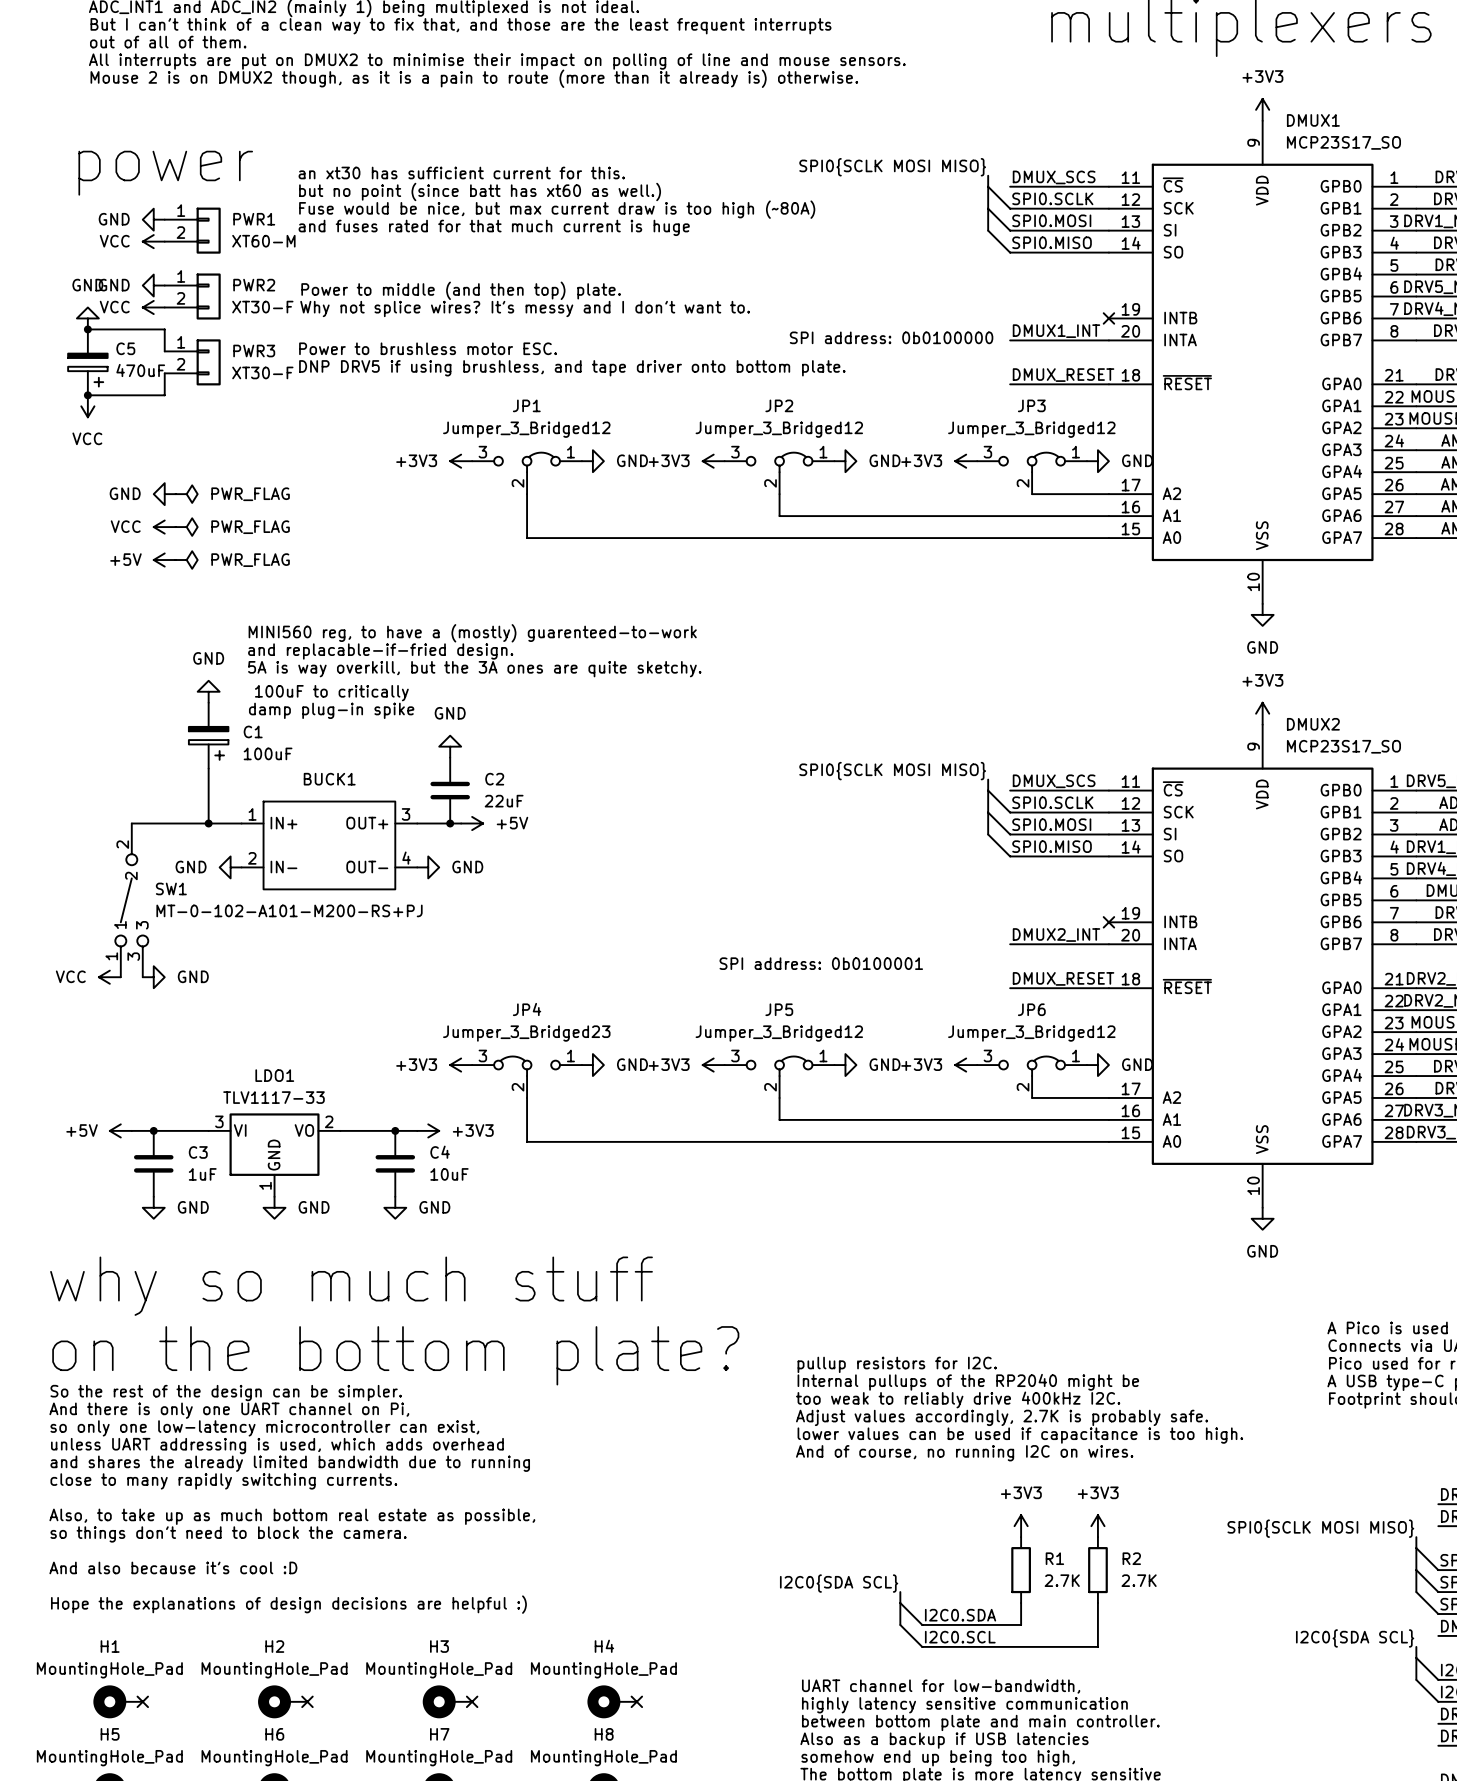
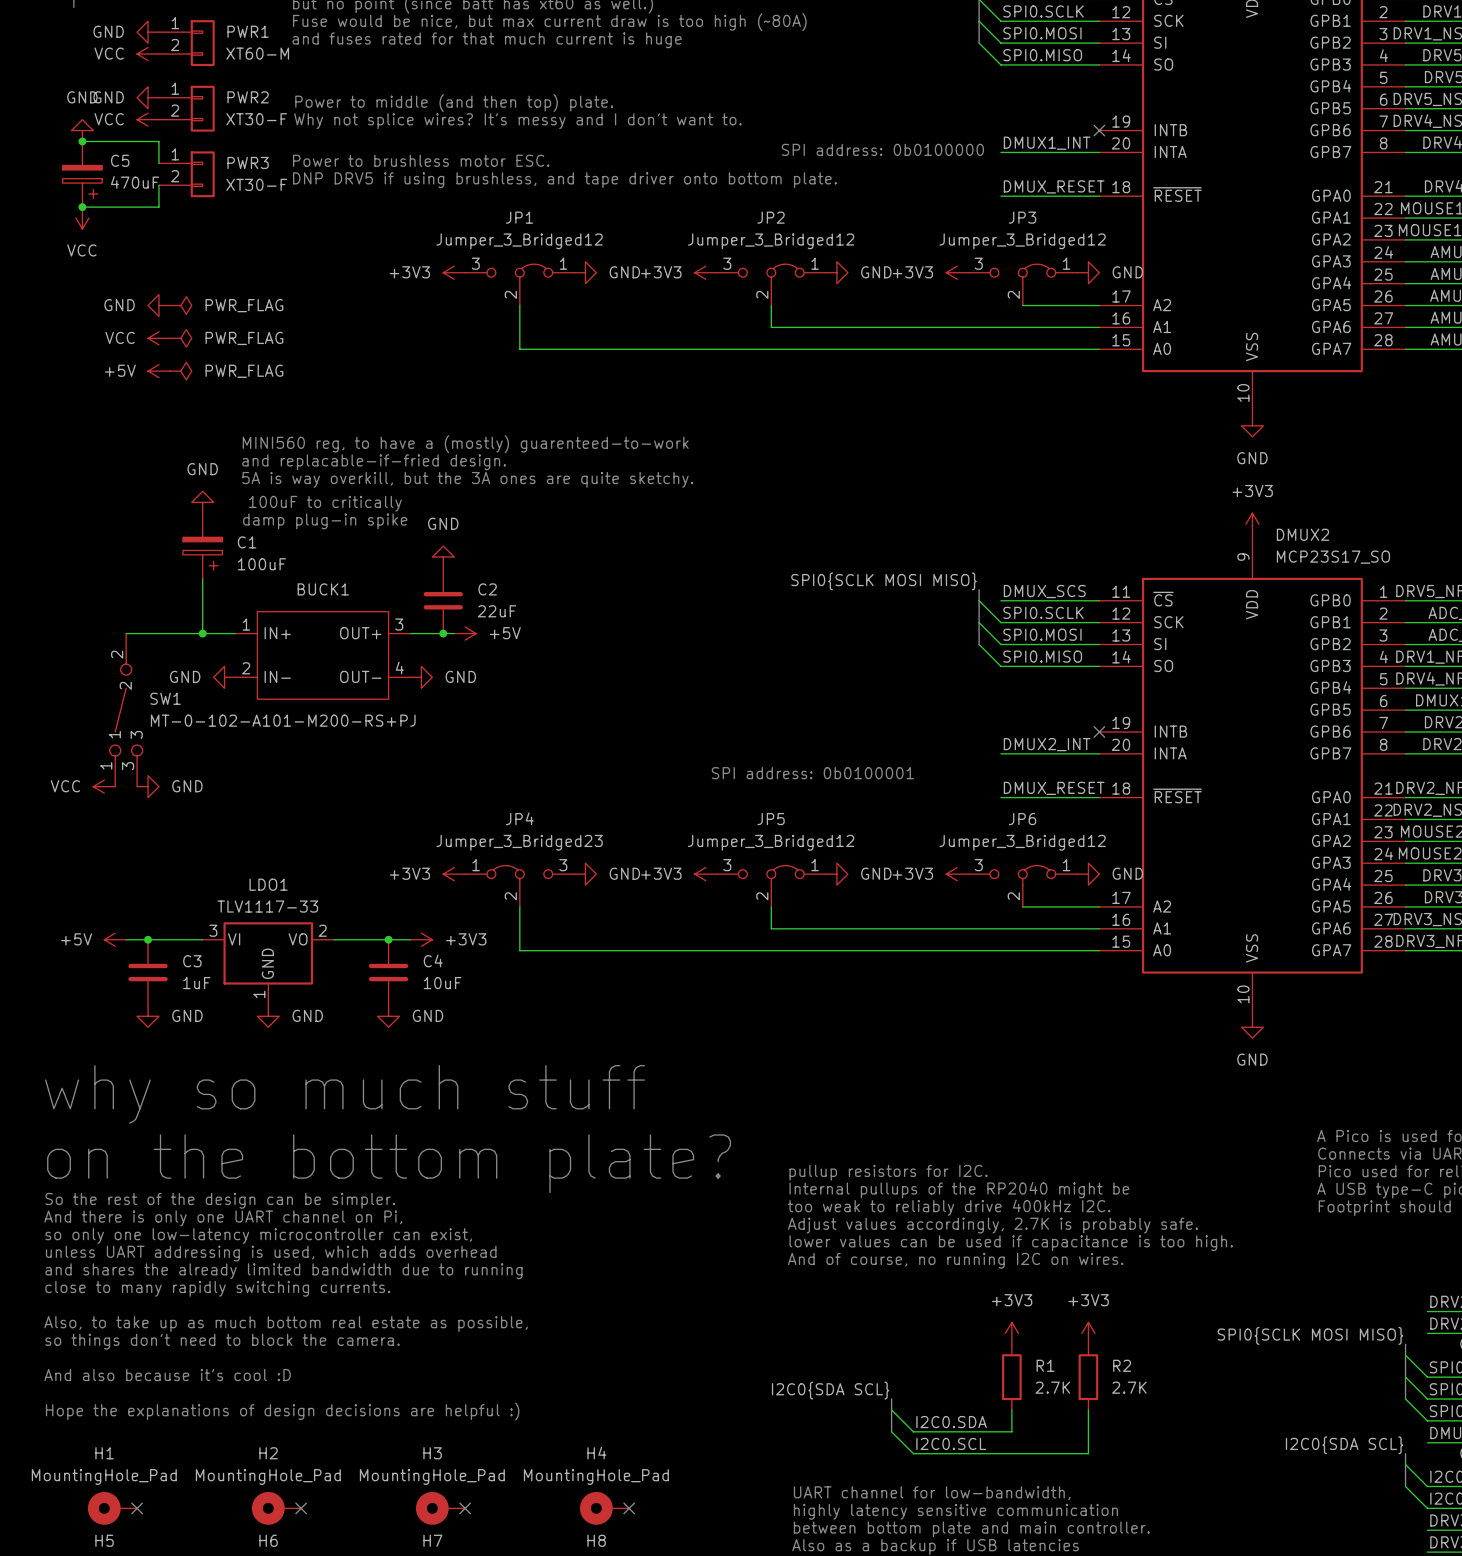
JP4 pin number: 3 (482, 1055) -> 1 (476, 865)
JP4 pin number: 1 (570, 1055) -> 3 (563, 865)

